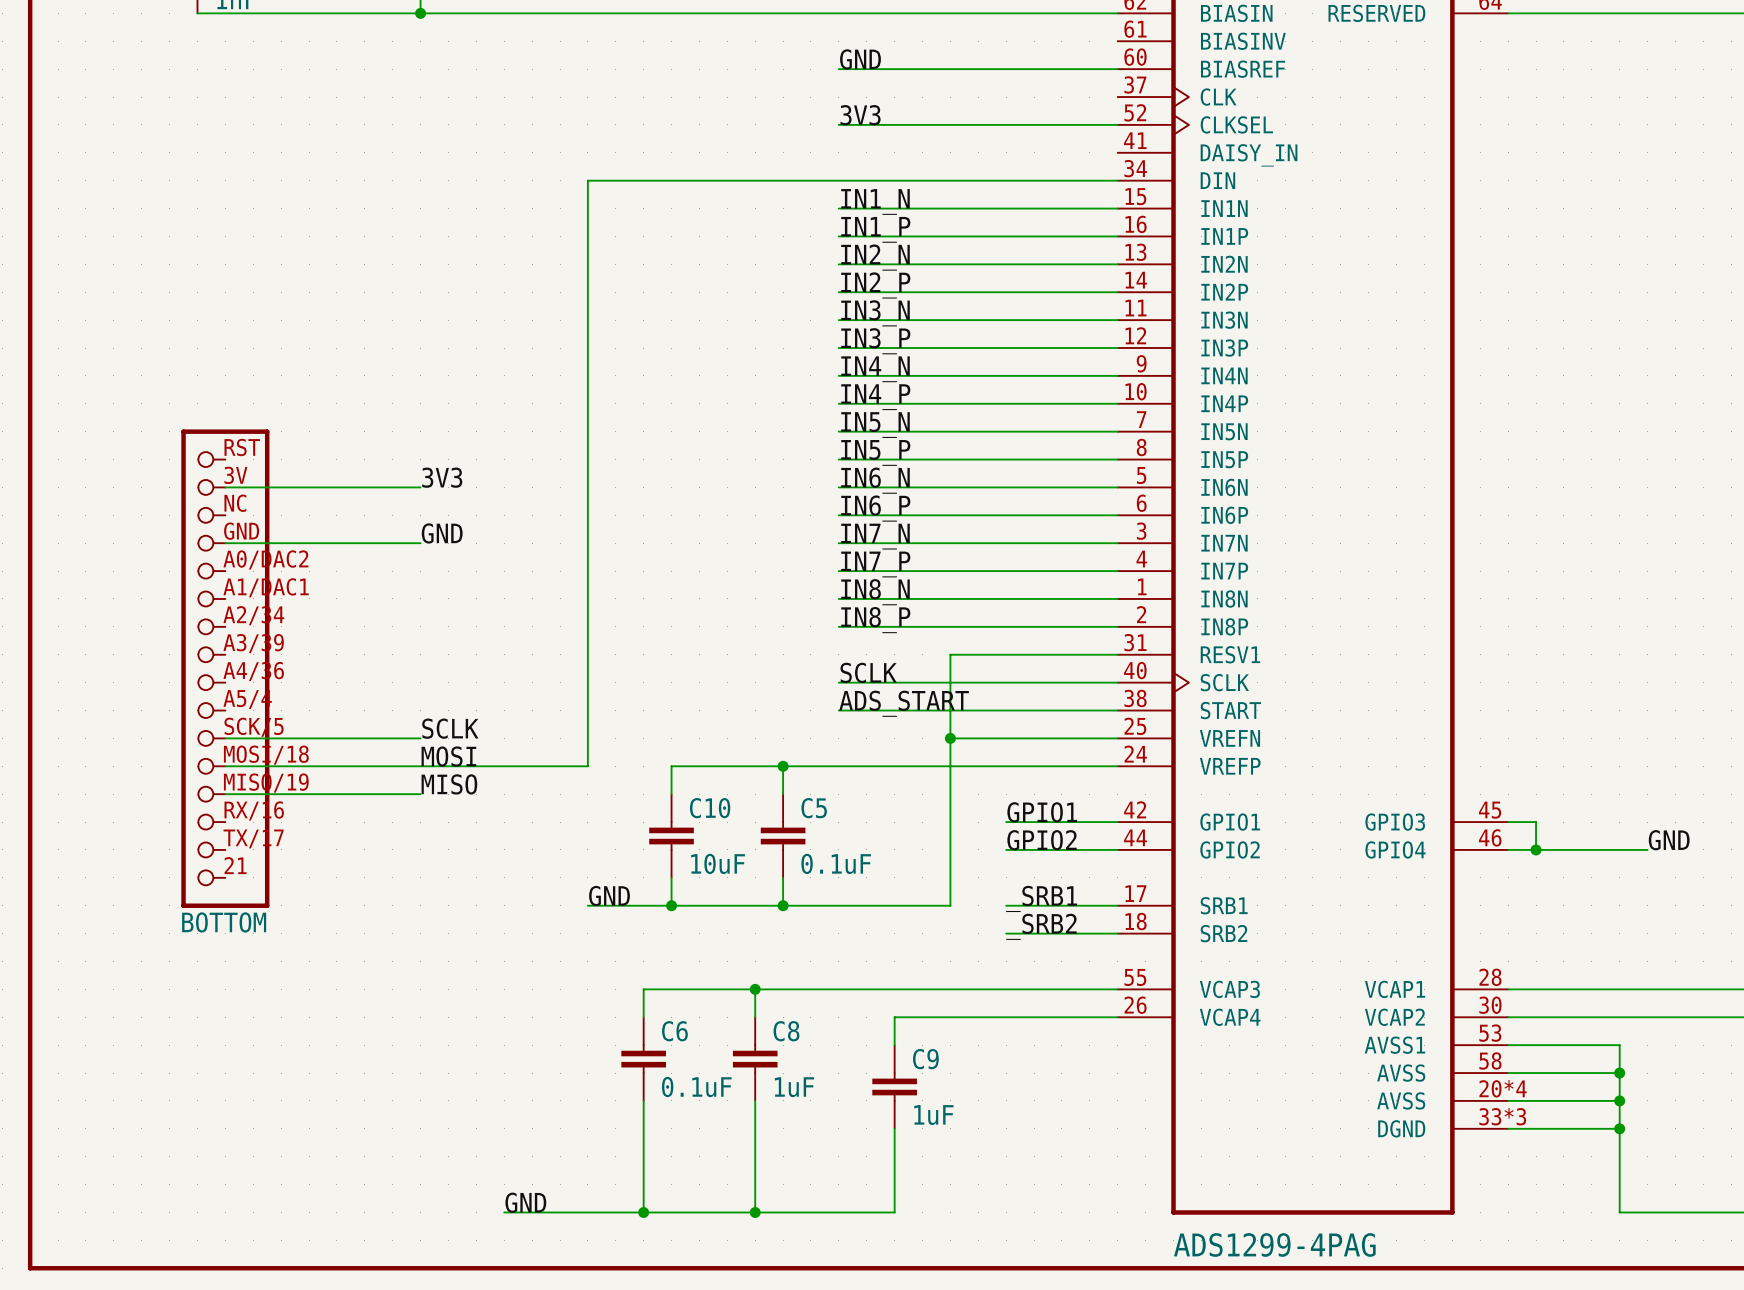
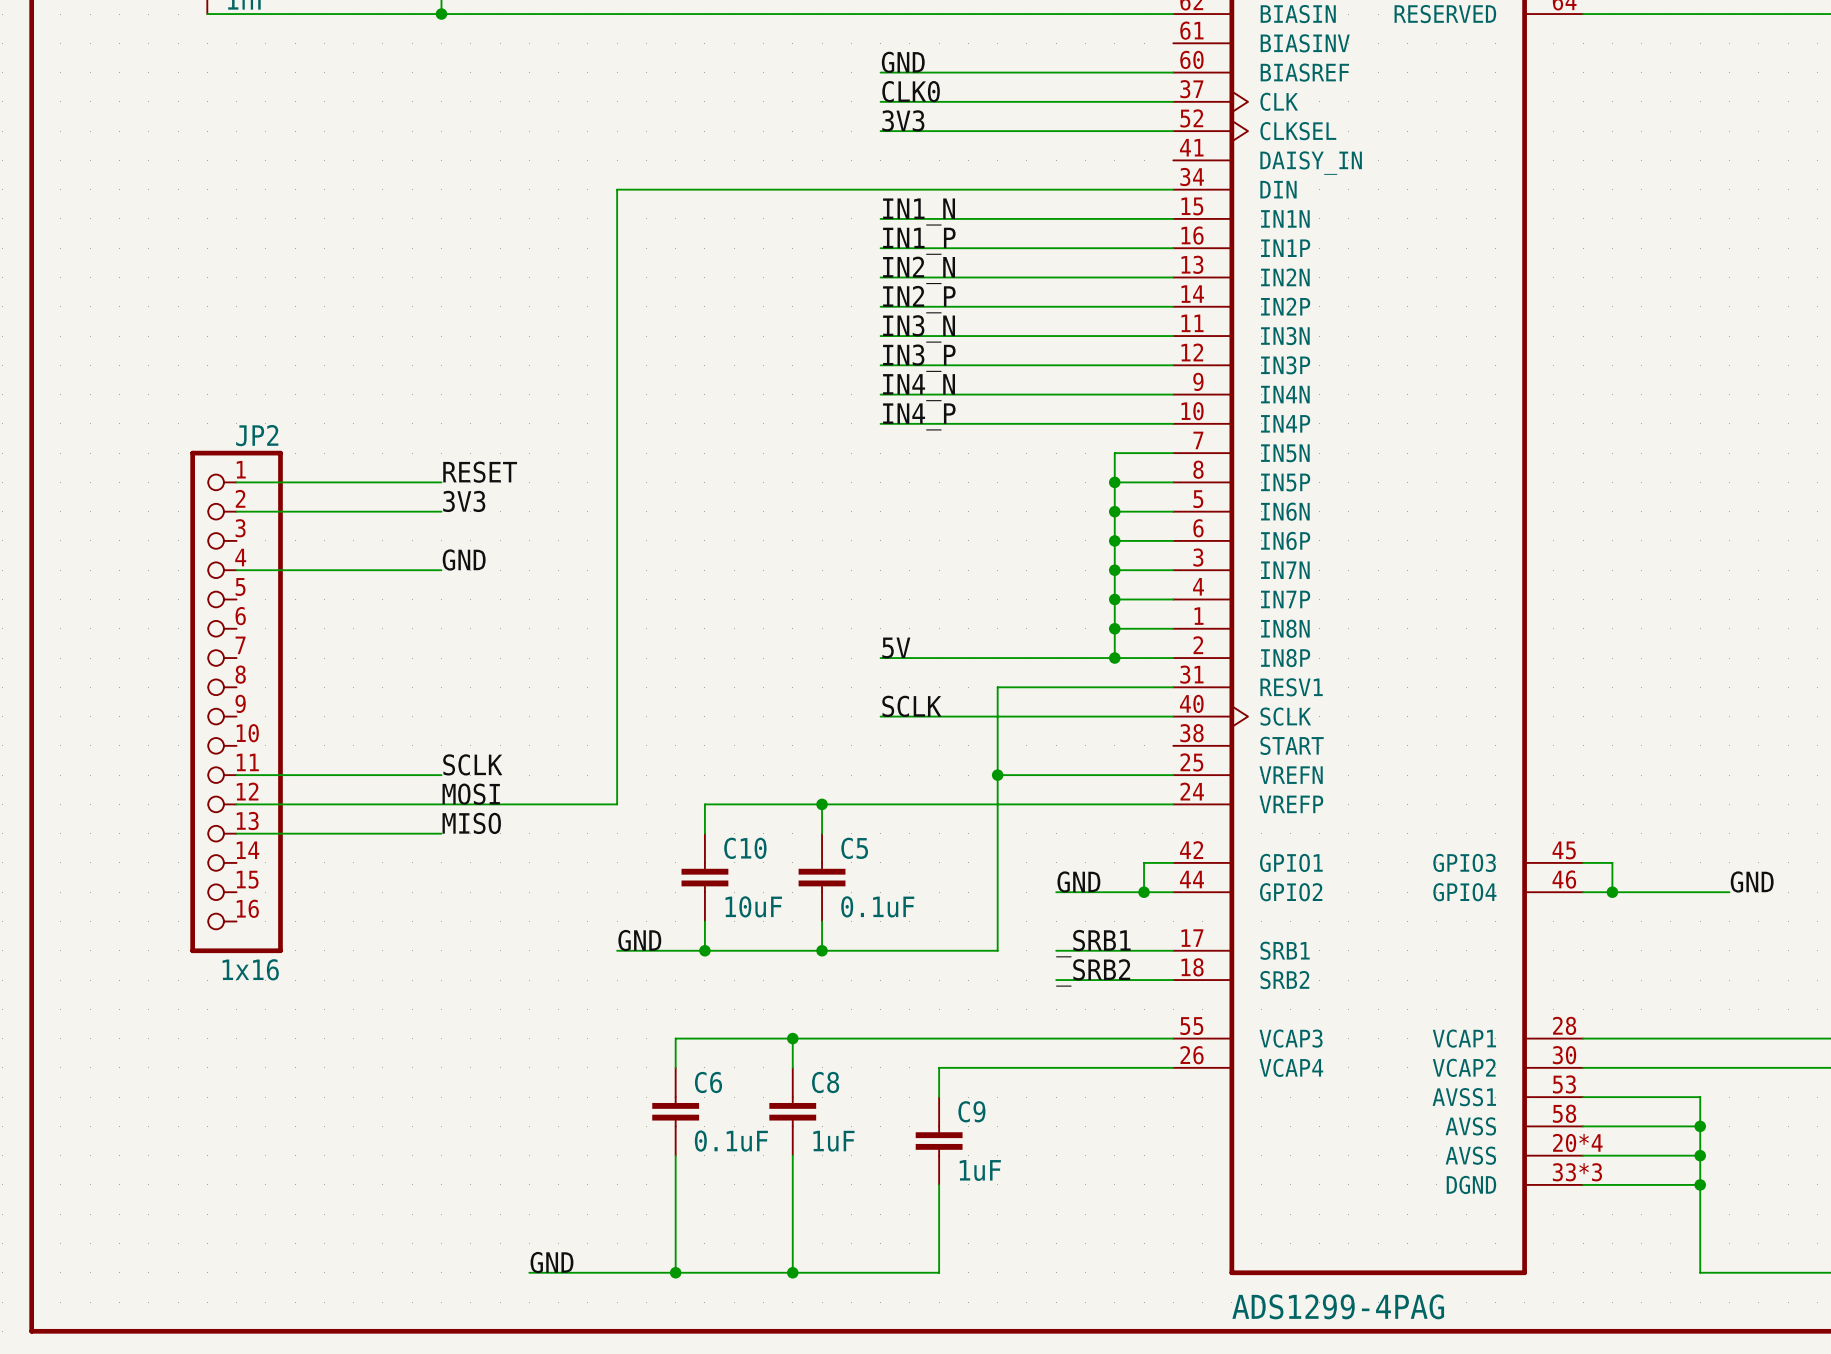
label: none -> CLK0 (911, 91)
wire: none -> (880, 101) (1173, 101)
label: IN5_N (875, 425) -> none
BOTTOM symbol: [181, 429, 270, 908] -> [190, 450, 283, 954]
wire: (838, 431) (1061, 431) -> (1114, 658) (1114, 453)
label: none -> RESET (480, 472)
label: IN5_P (875, 452) -> none
wire: none -> (236, 482) (441, 482)
wire: (838, 459) (1061, 459) -> none
junction: none -> (1114, 482)
label: IN6_N (875, 480) -> none
wire: (838, 487) (1061, 487) -> none
junction: none -> (1114, 511)
label: IN6_P (875, 508) -> none
wire: (838, 515) (1061, 515) -> none
junction: none -> (1114, 540)
label: IN7_N (875, 536) -> none
wire: (838, 543) (1061, 543) -> none
junction: none -> (1114, 570)
label: IN7_P (875, 564) -> none
wire: (838, 571) (1061, 571) -> none
junction: none -> (1114, 599)
label: IN8_N (875, 592) -> none
wire: (838, 598) (1061, 598) -> none
junction: none -> (1114, 628)
label: IN8_P (875, 620) -> 5V (896, 647)
junction: none -> (1114, 658)
label: ADS_START (904, 703) -> none
wire: (838, 710) (1117, 710) -> none
label: GPIO1 (1042, 812) -> none
wire: (1006, 822) (1089, 822) -> (1144, 892) (1144, 862)
label: GPIO2 (1042, 840) -> GND (1078, 881)
junction: none -> (1144, 892)
BOTTOM name: BOTTOM (224, 922) -> JP2 (257, 435)
BOTTOM value: none -> 1x16 (250, 969)

